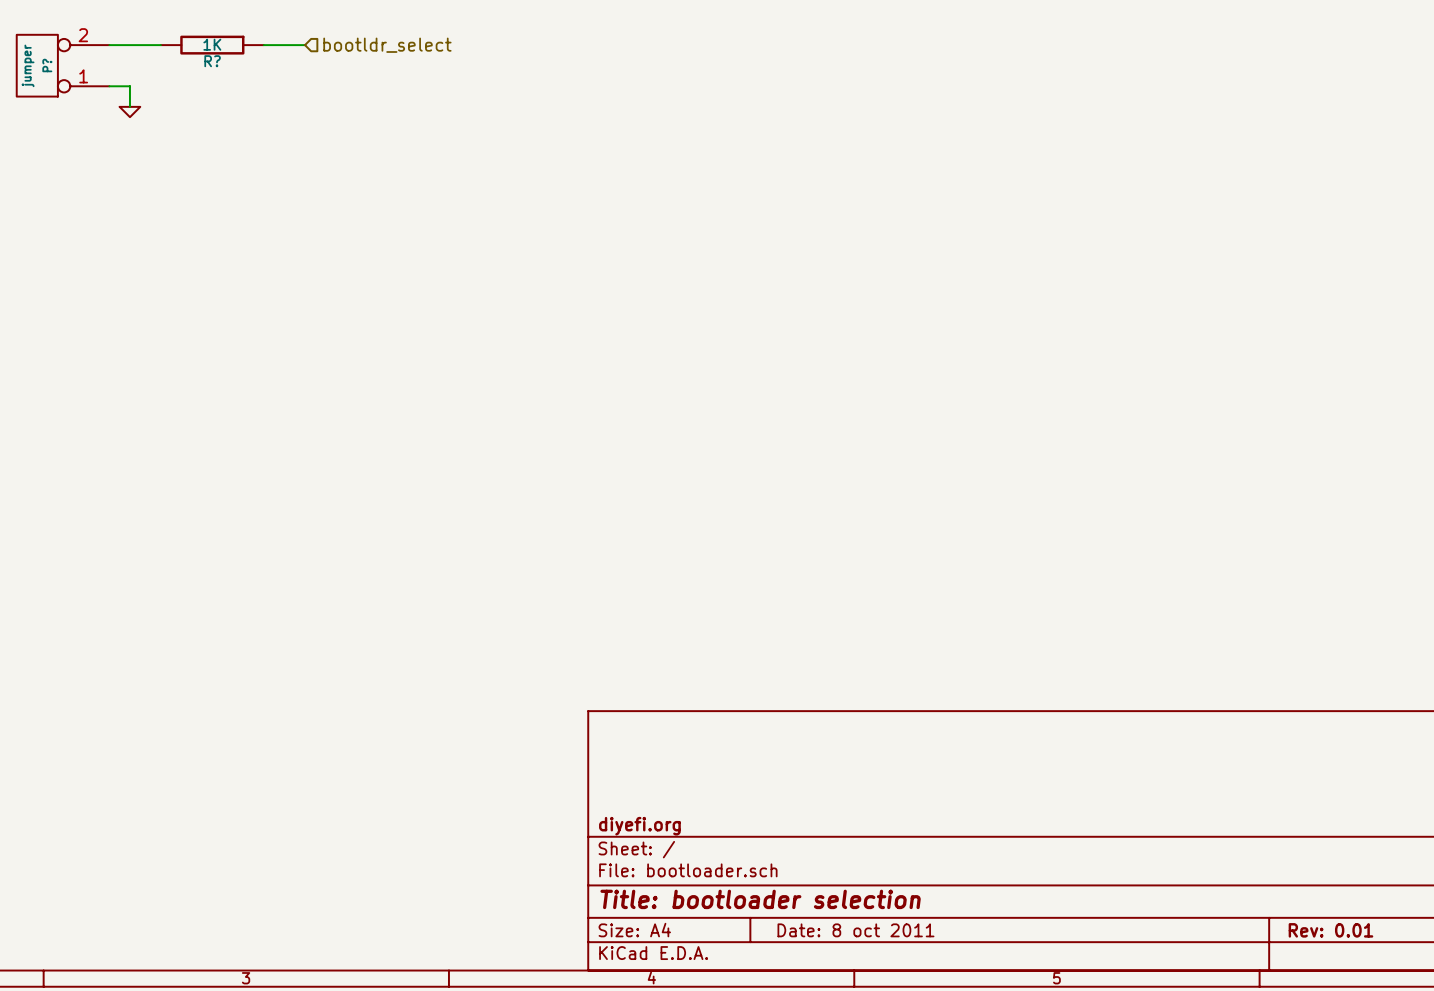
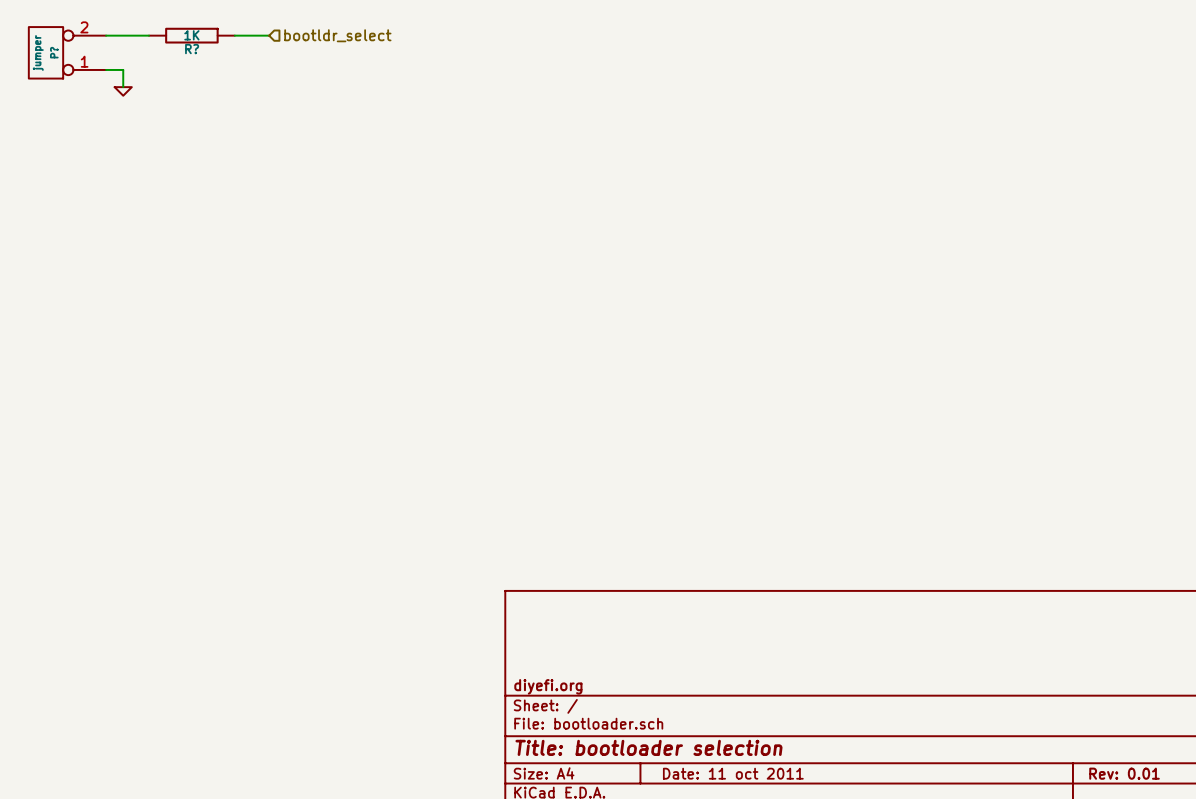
title block: Date: 8 oct 2011 (855, 930) -> Date: 11 oct 2011 (733, 773)

